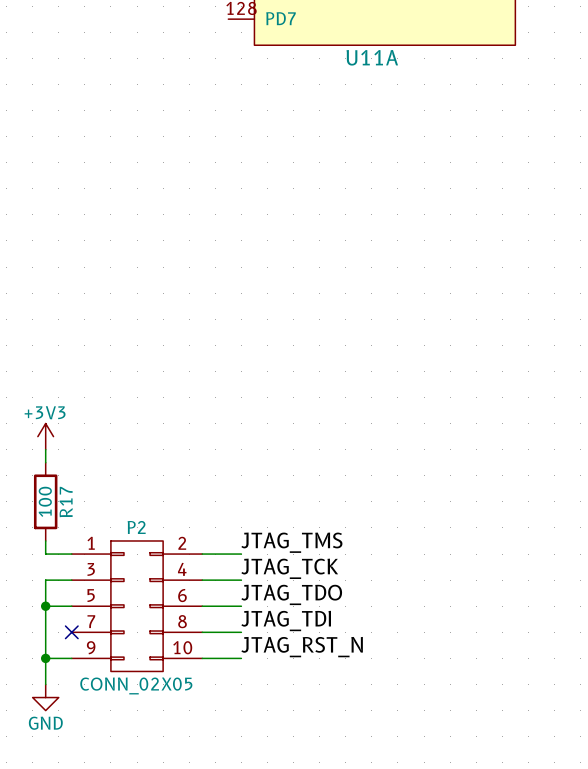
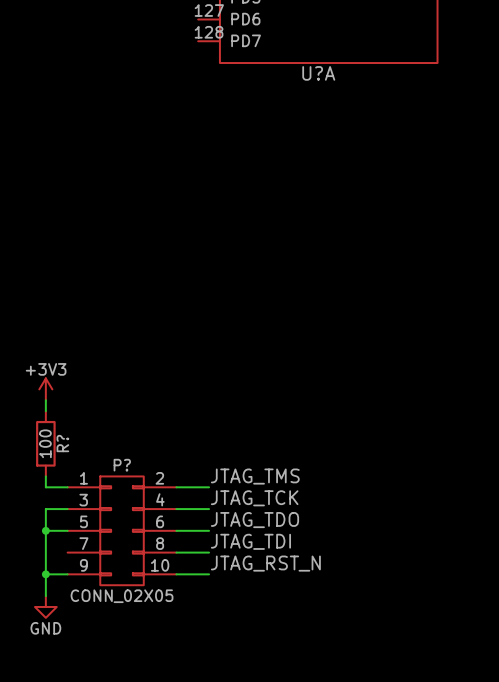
U11A name: U11A (372, 57) -> U?A (318, 73)
R17 name: R17 (66, 502) -> R? (62, 443)
P2 name: P2 (136, 527) -> P? (122, 465)
no-connect mark: (71, 632) -> none

